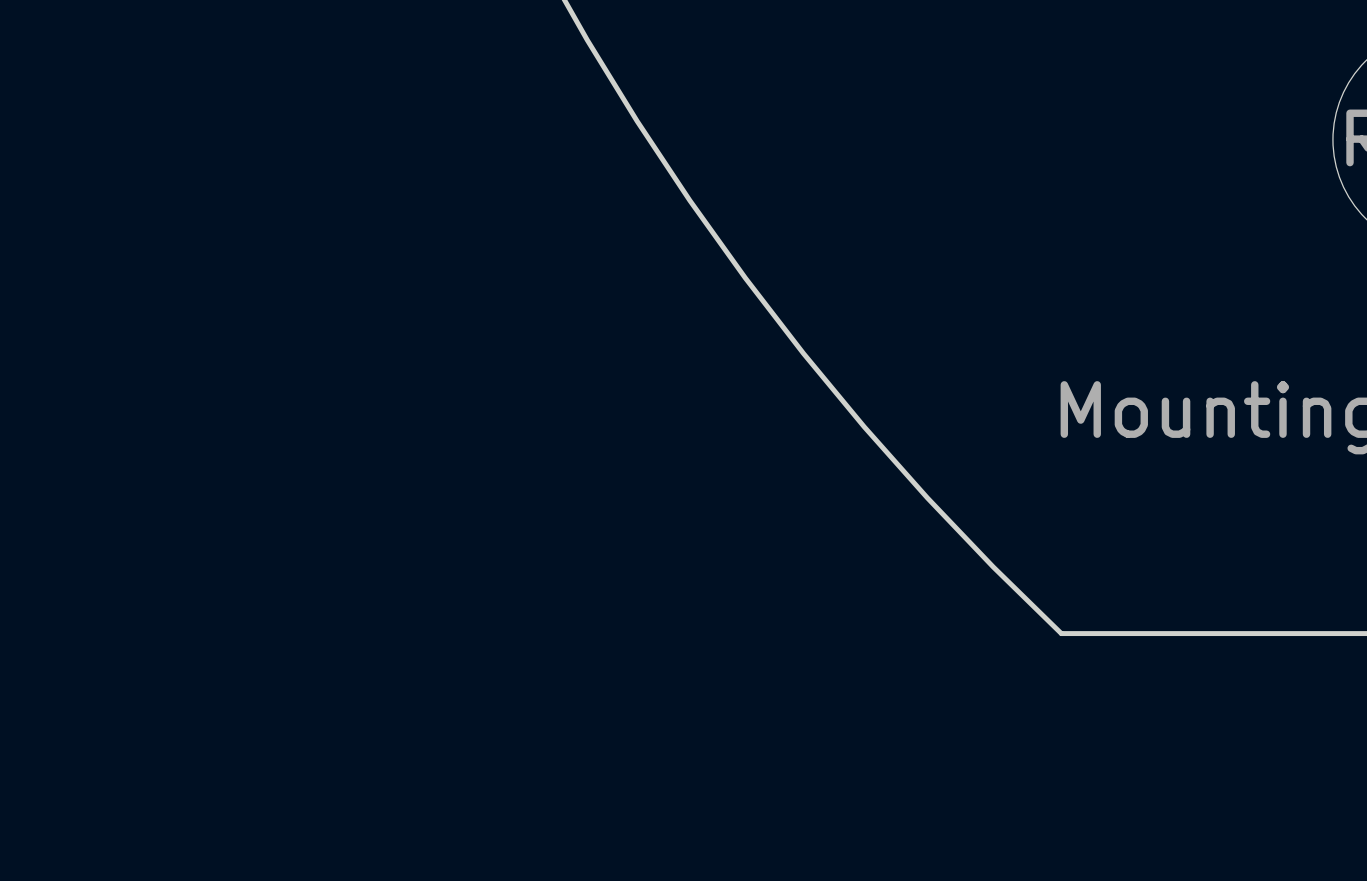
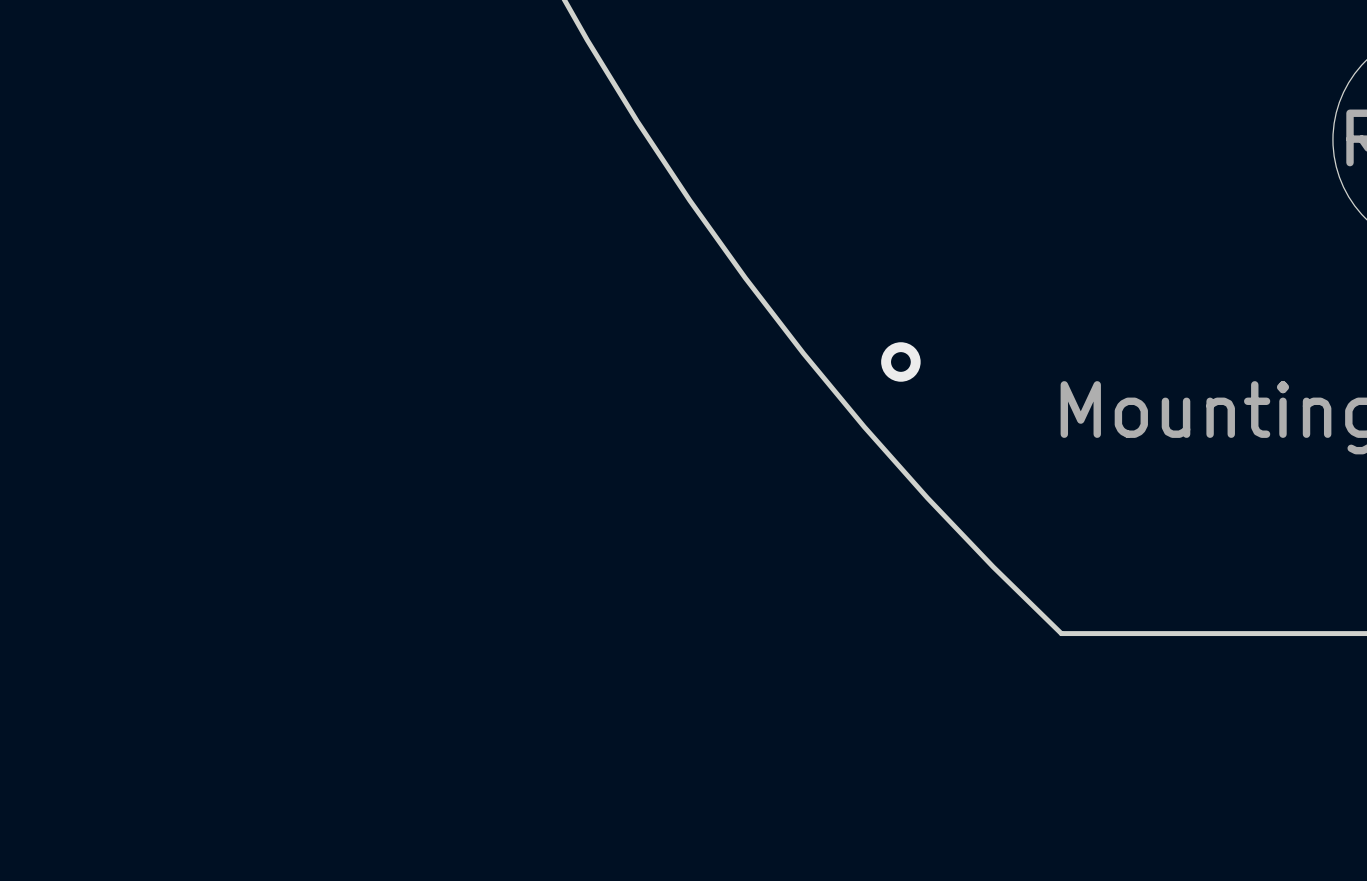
via: none -> (900, 361)

